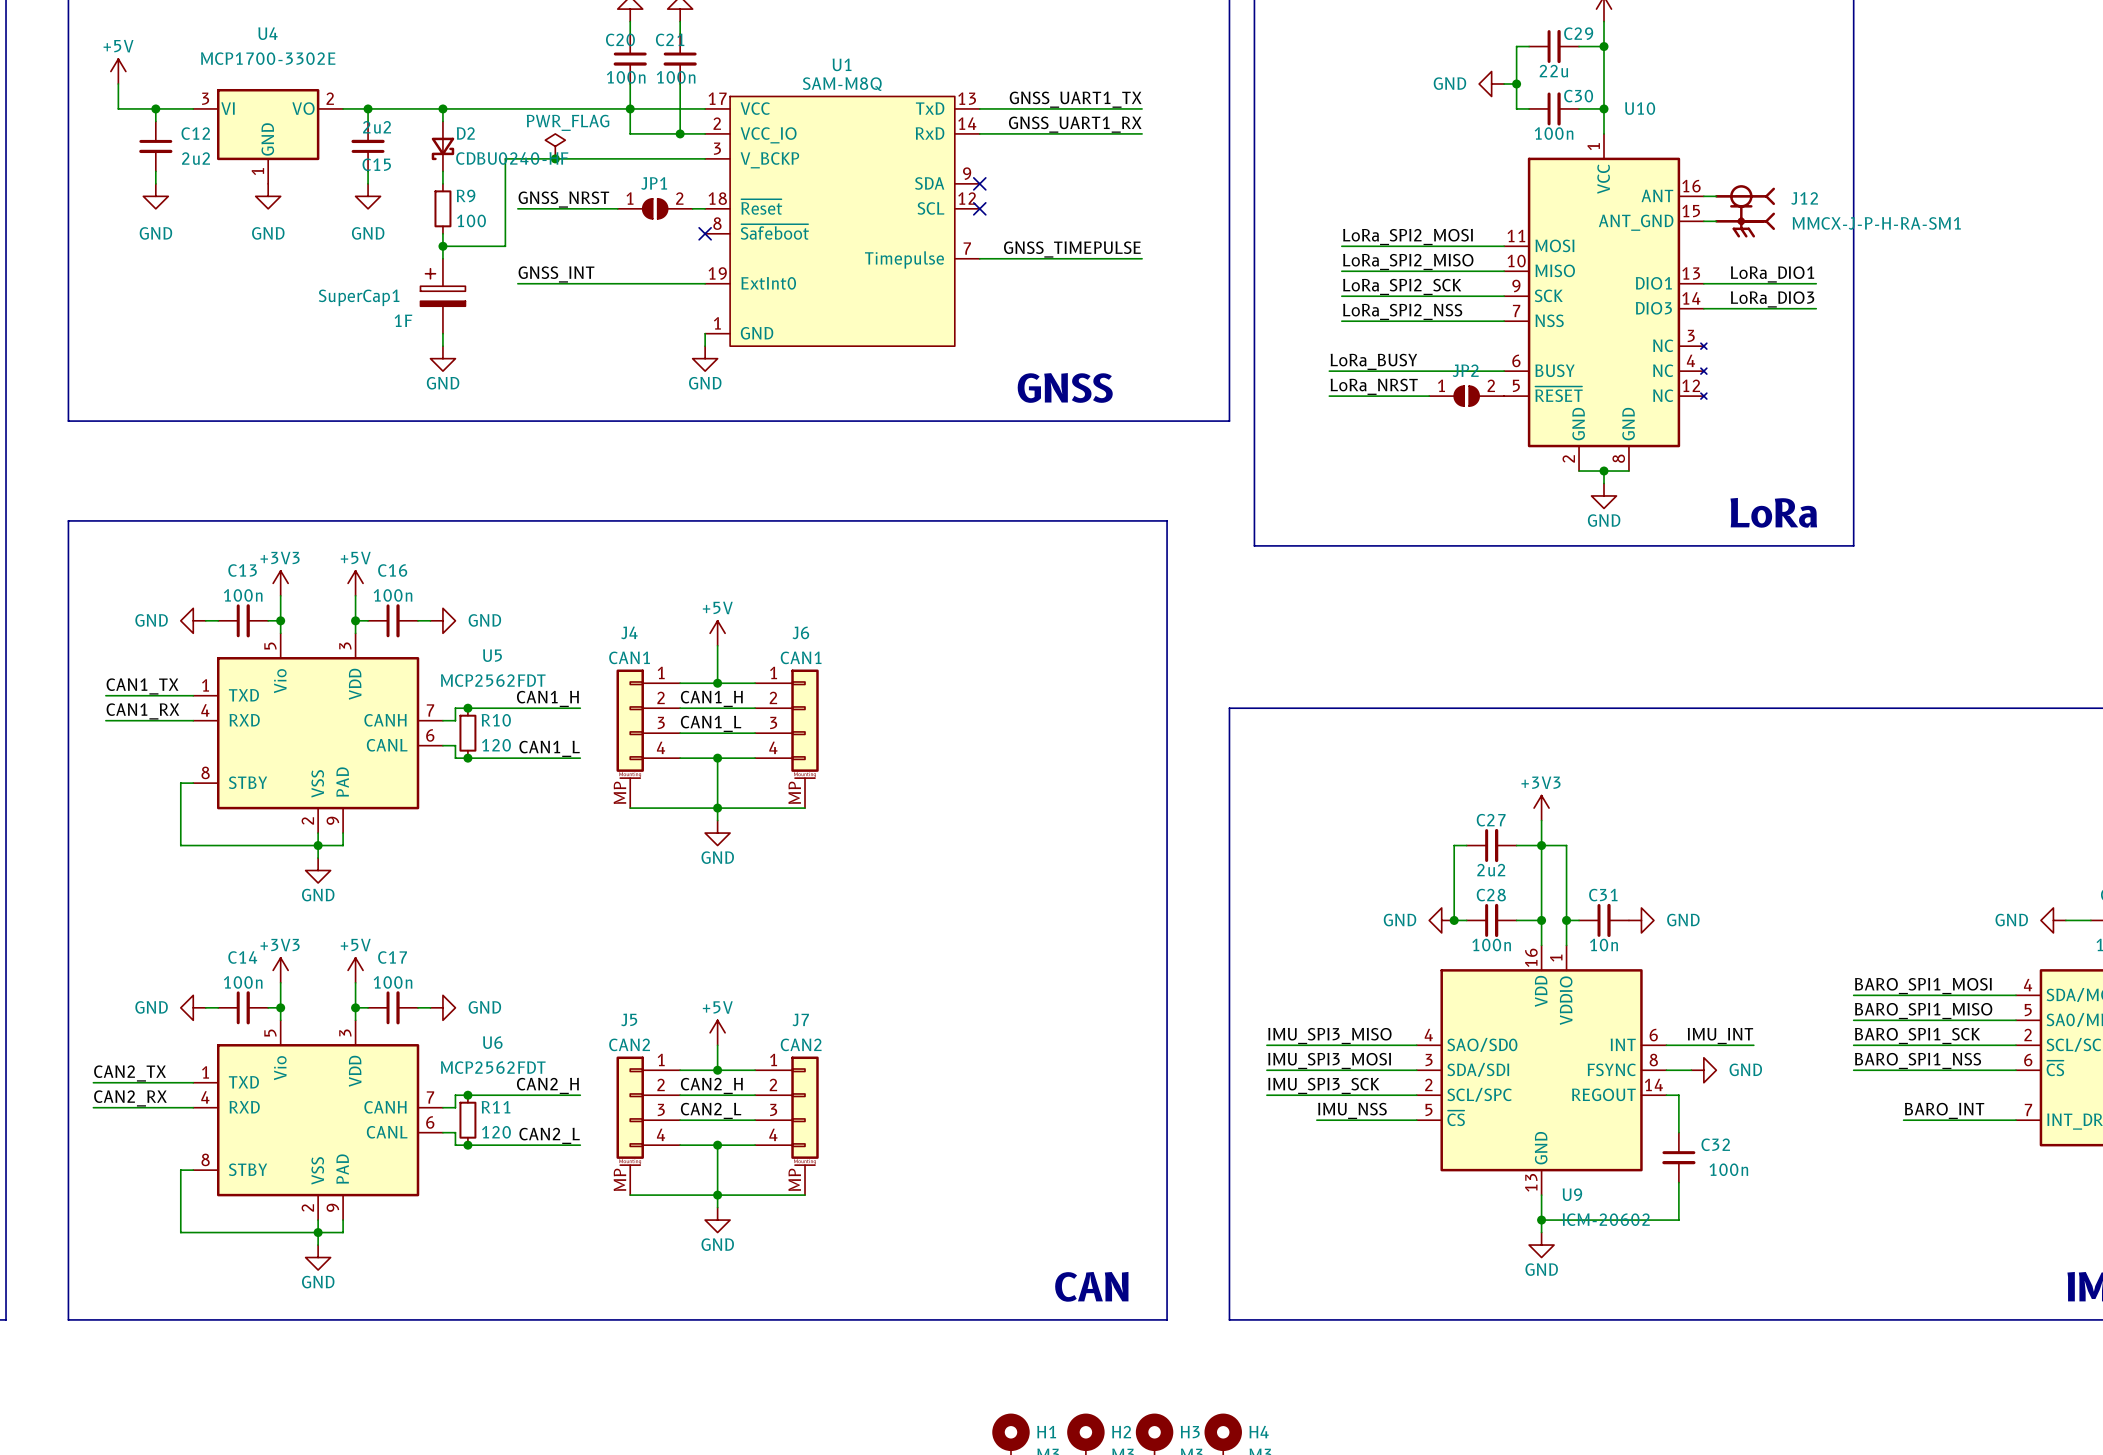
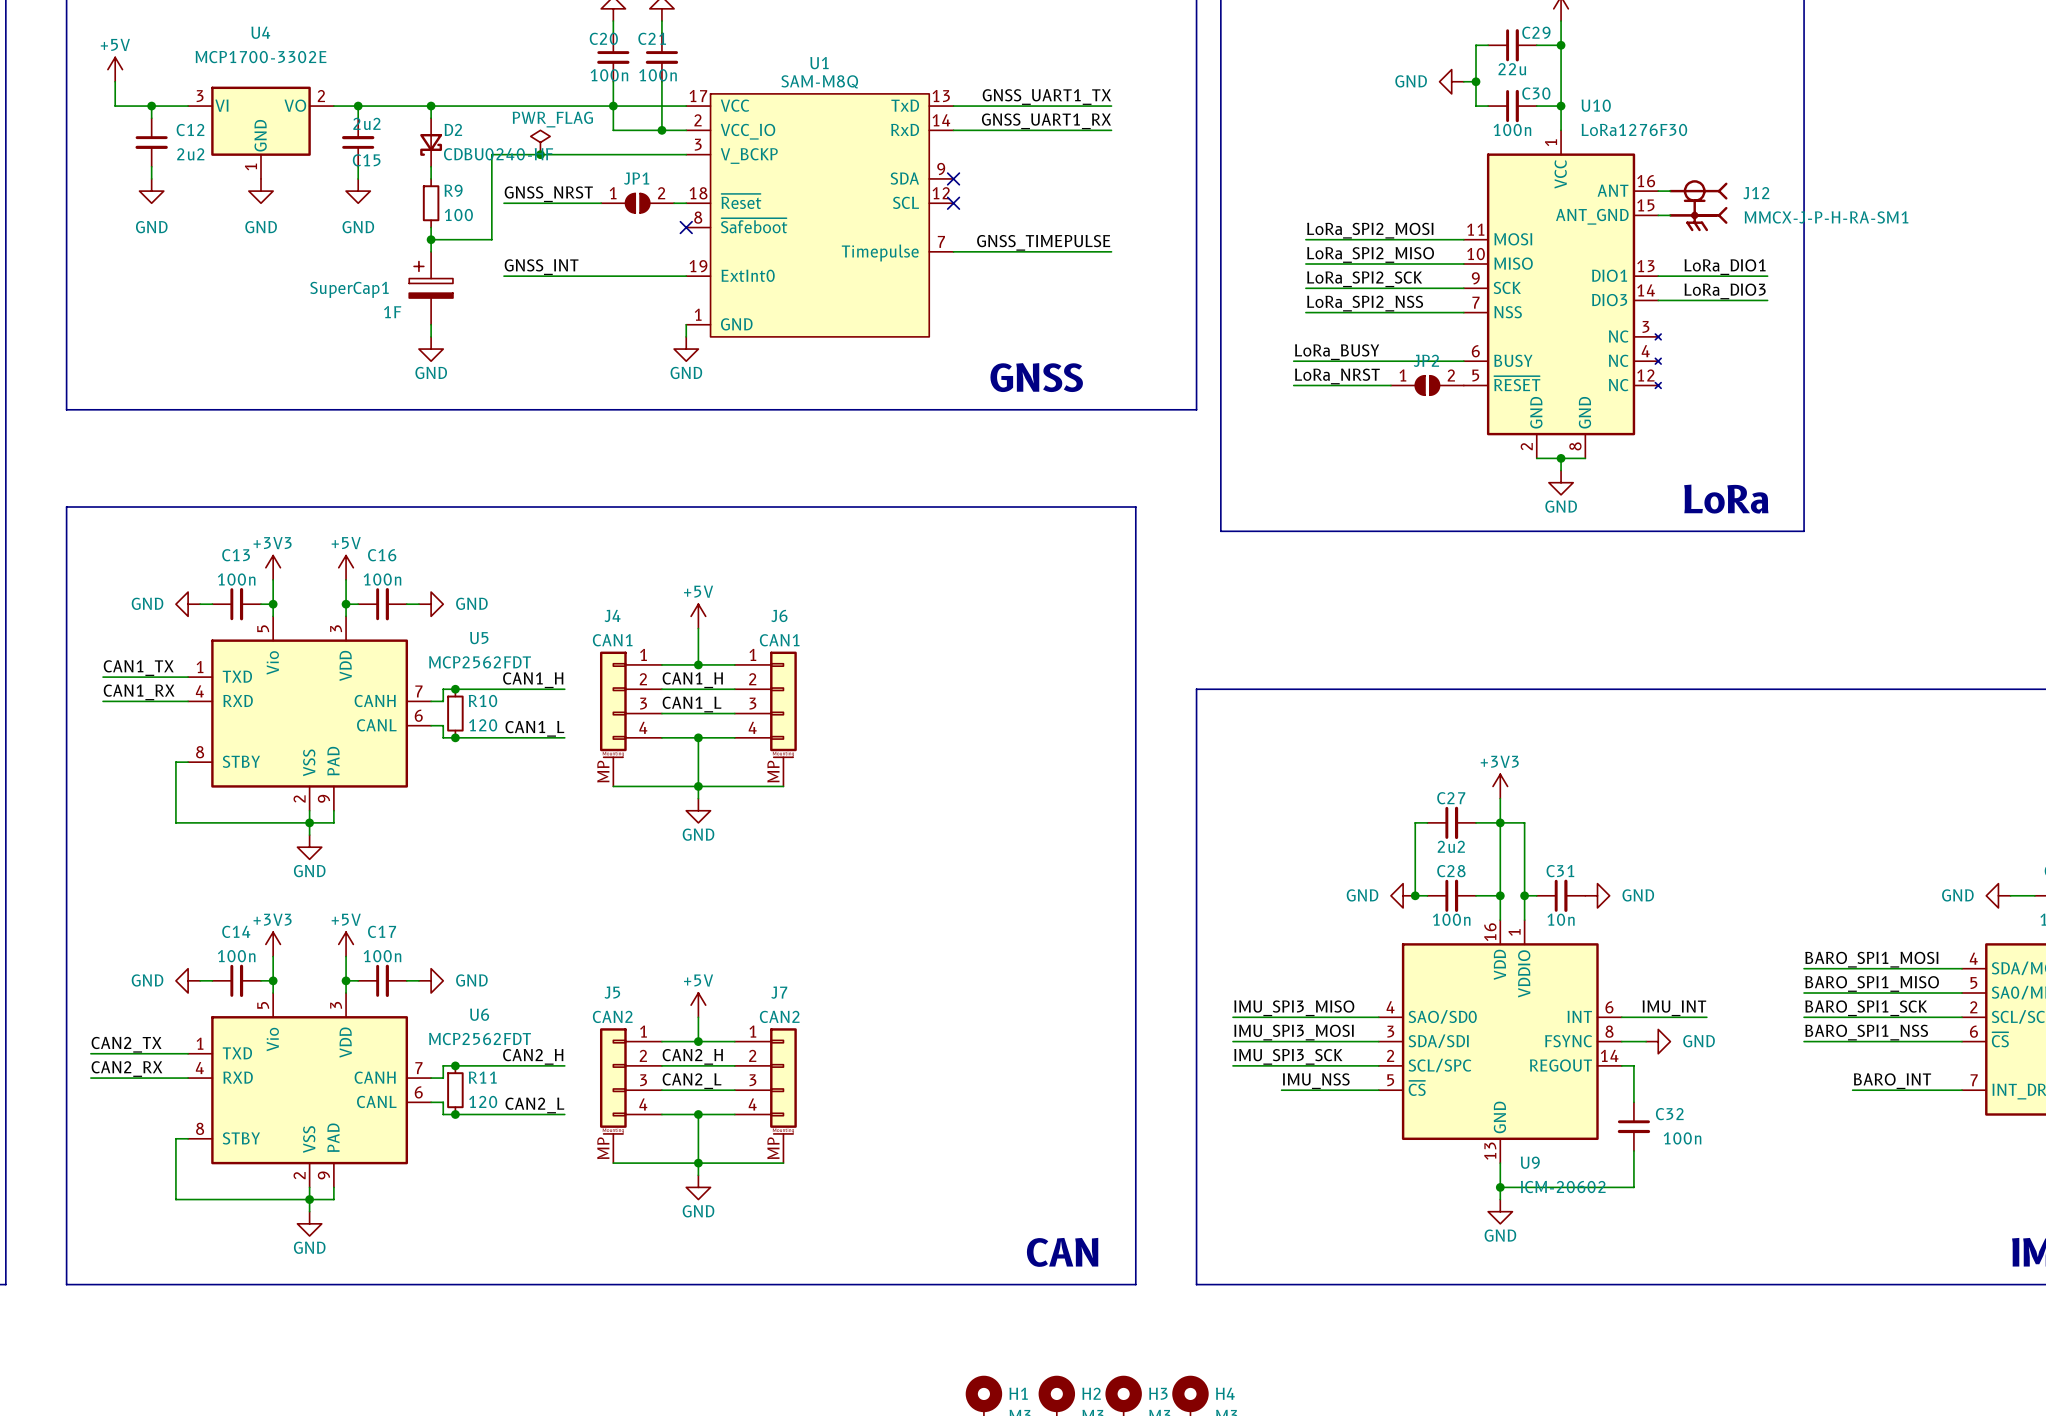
U10 value: none -> LoRa1276F30 (1634, 129)

